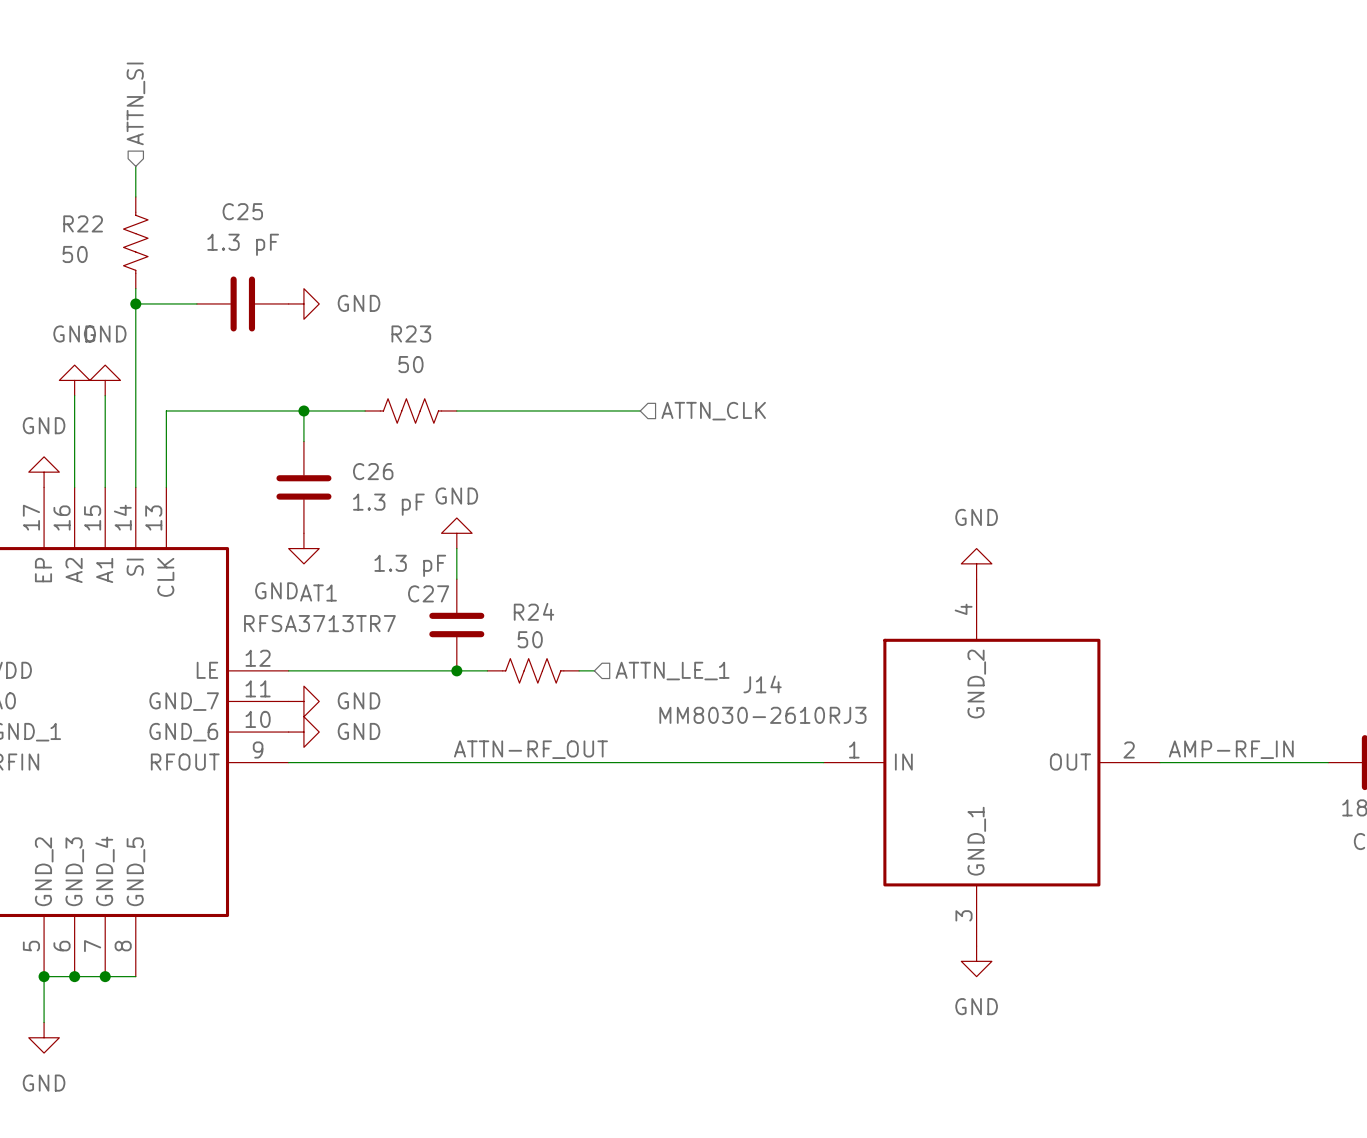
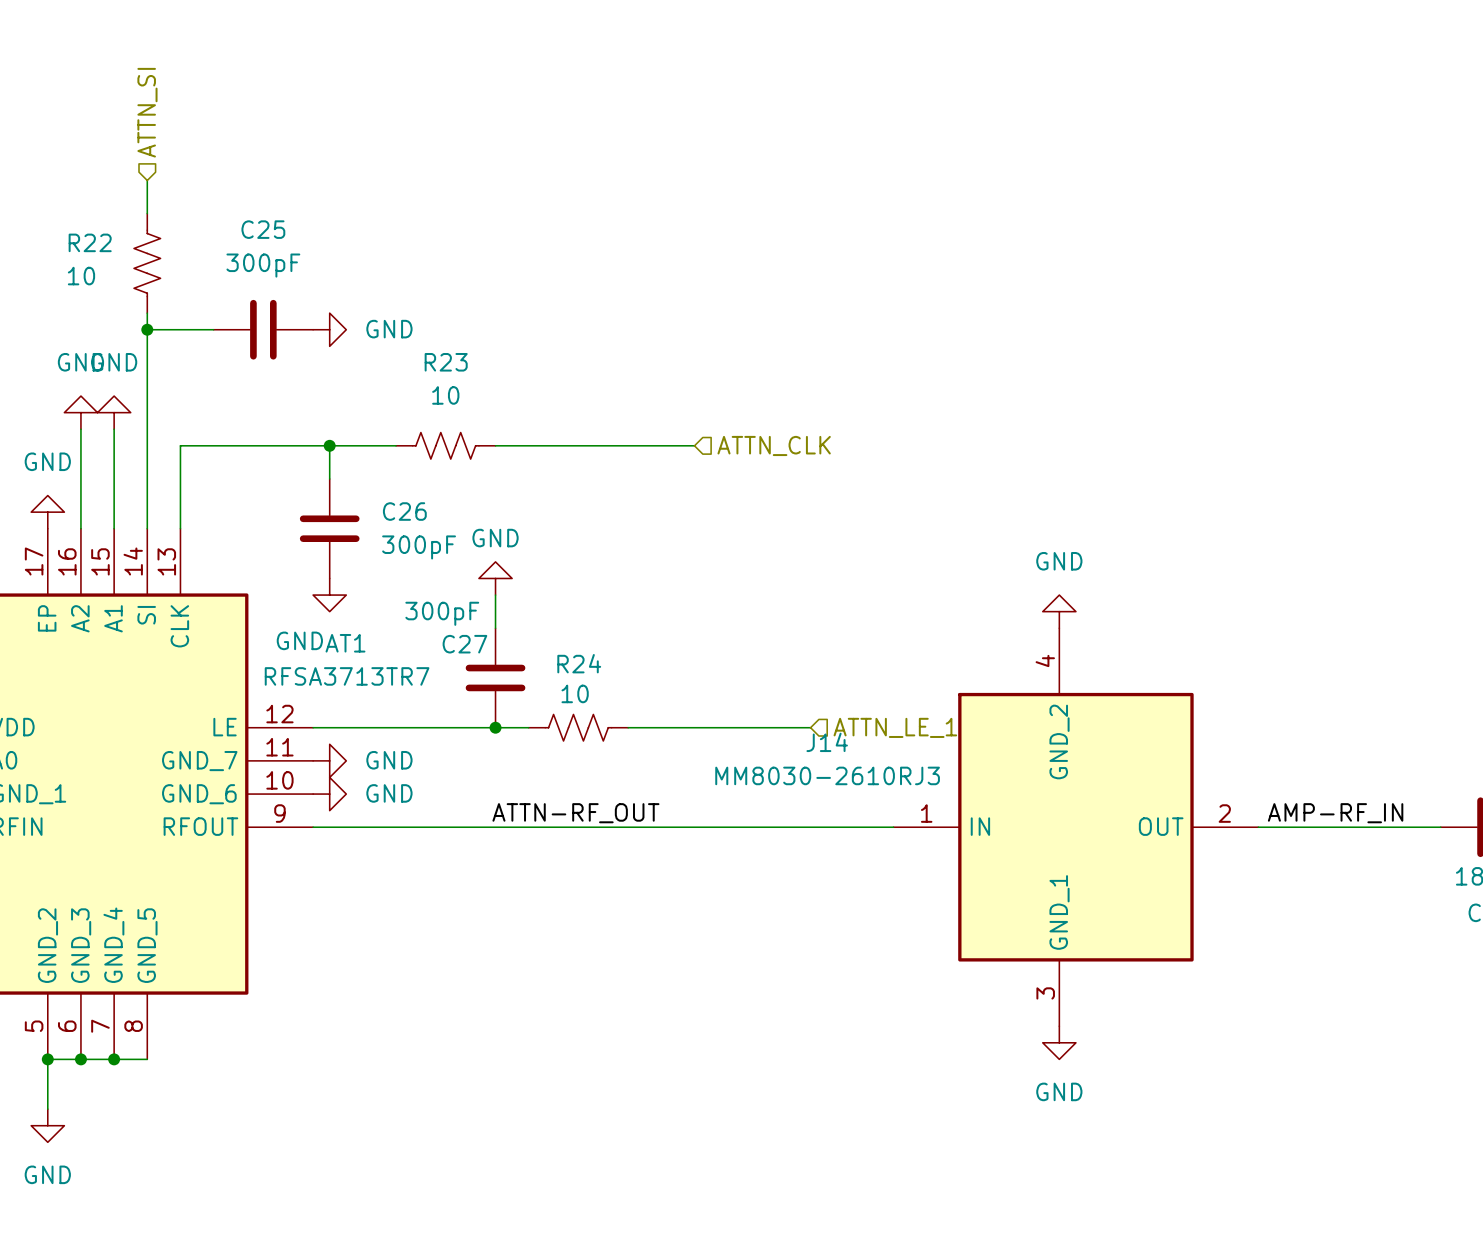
C25 value: 1.3 pF (243, 244) -> 300pF (263, 265)
R22 value: 50 (75, 254) -> 10 (81, 276)
R23 value: 50 (410, 364) -> 10 (445, 395)
C26 value: 1.3 pF (388, 504) -> 300pF (419, 547)
C27 value: 1.3 pF (410, 565) -> 300pF (442, 613)
R24 value: 50 (530, 639) -> 10 (575, 693)
wire: none -> (644, 727) (810, 727)
hierarchical label position: ATTN_LE_1 (672, 671) -> ATTN_LE_1 (895, 727)

